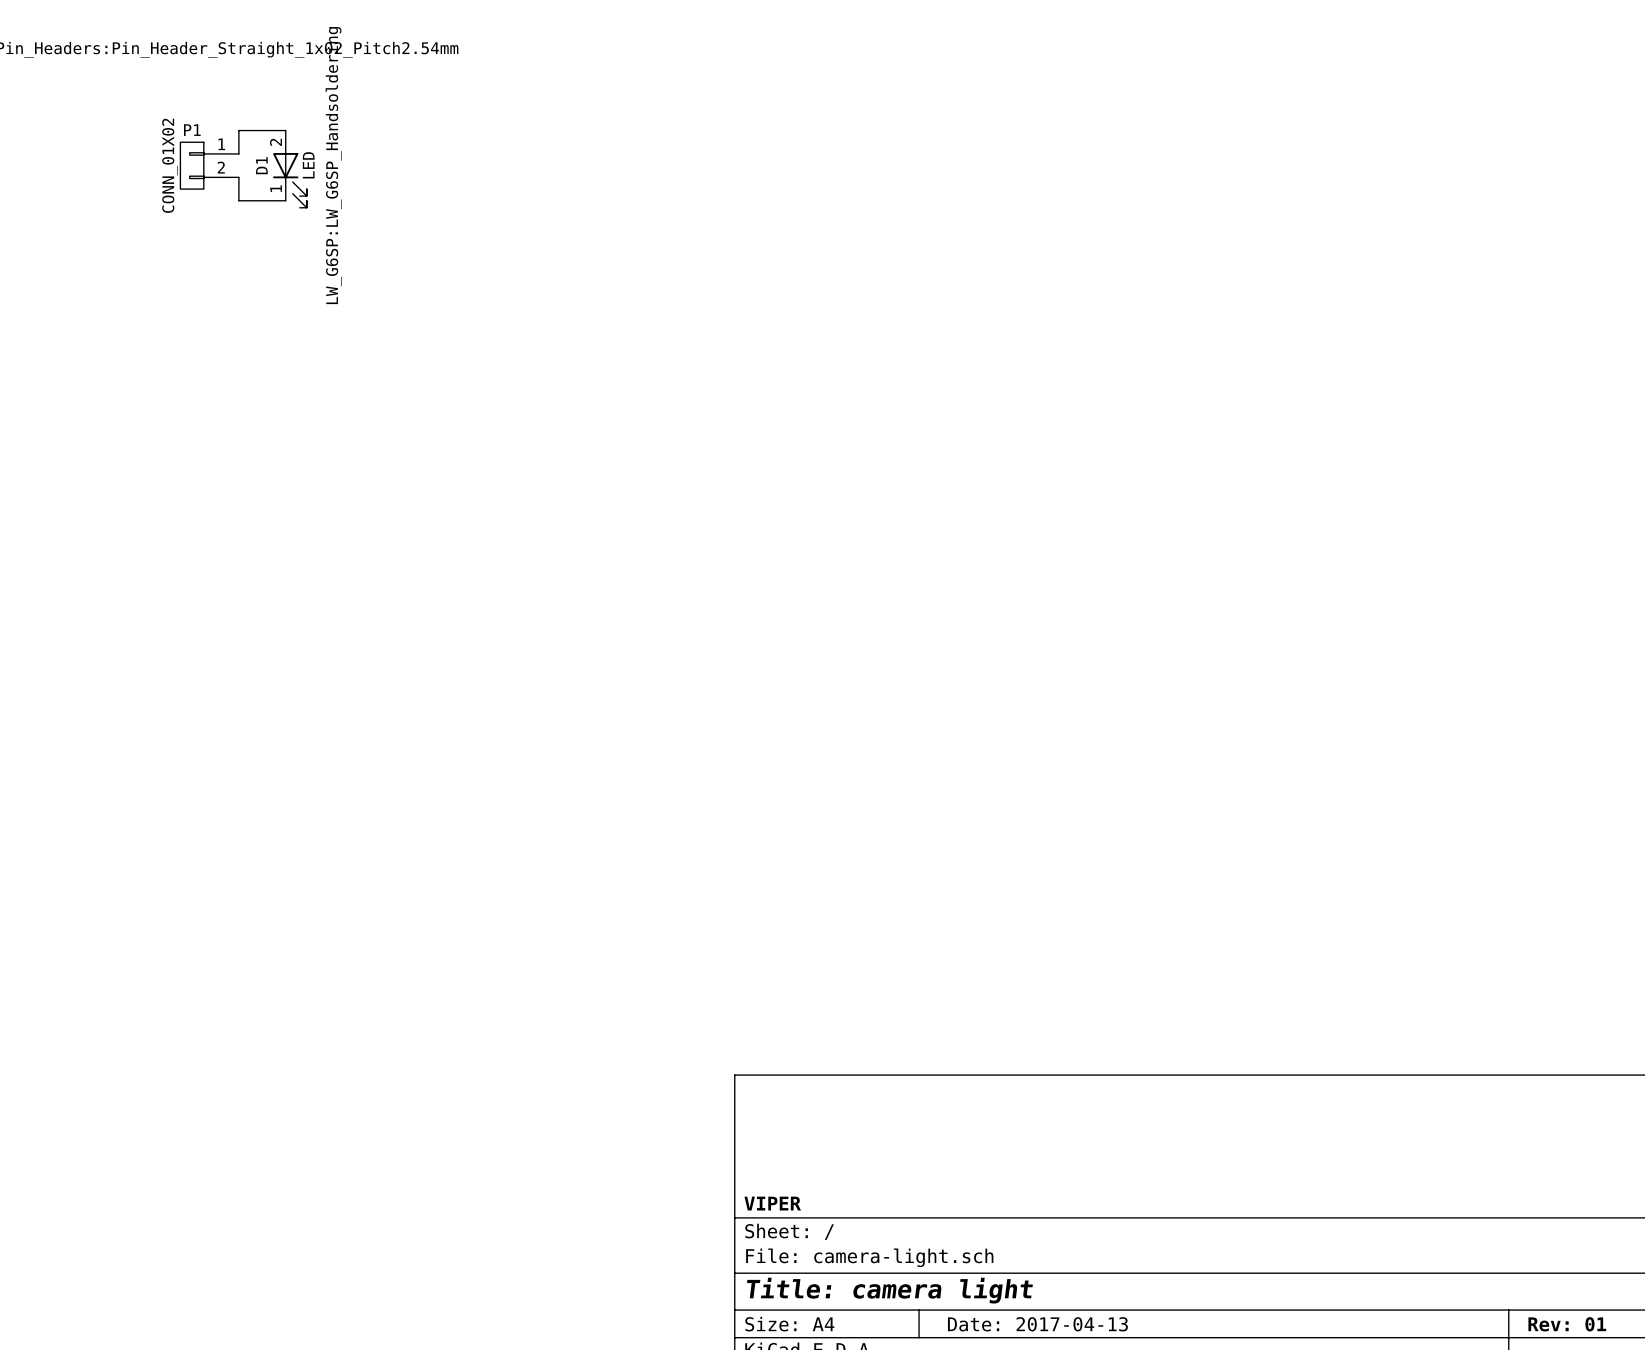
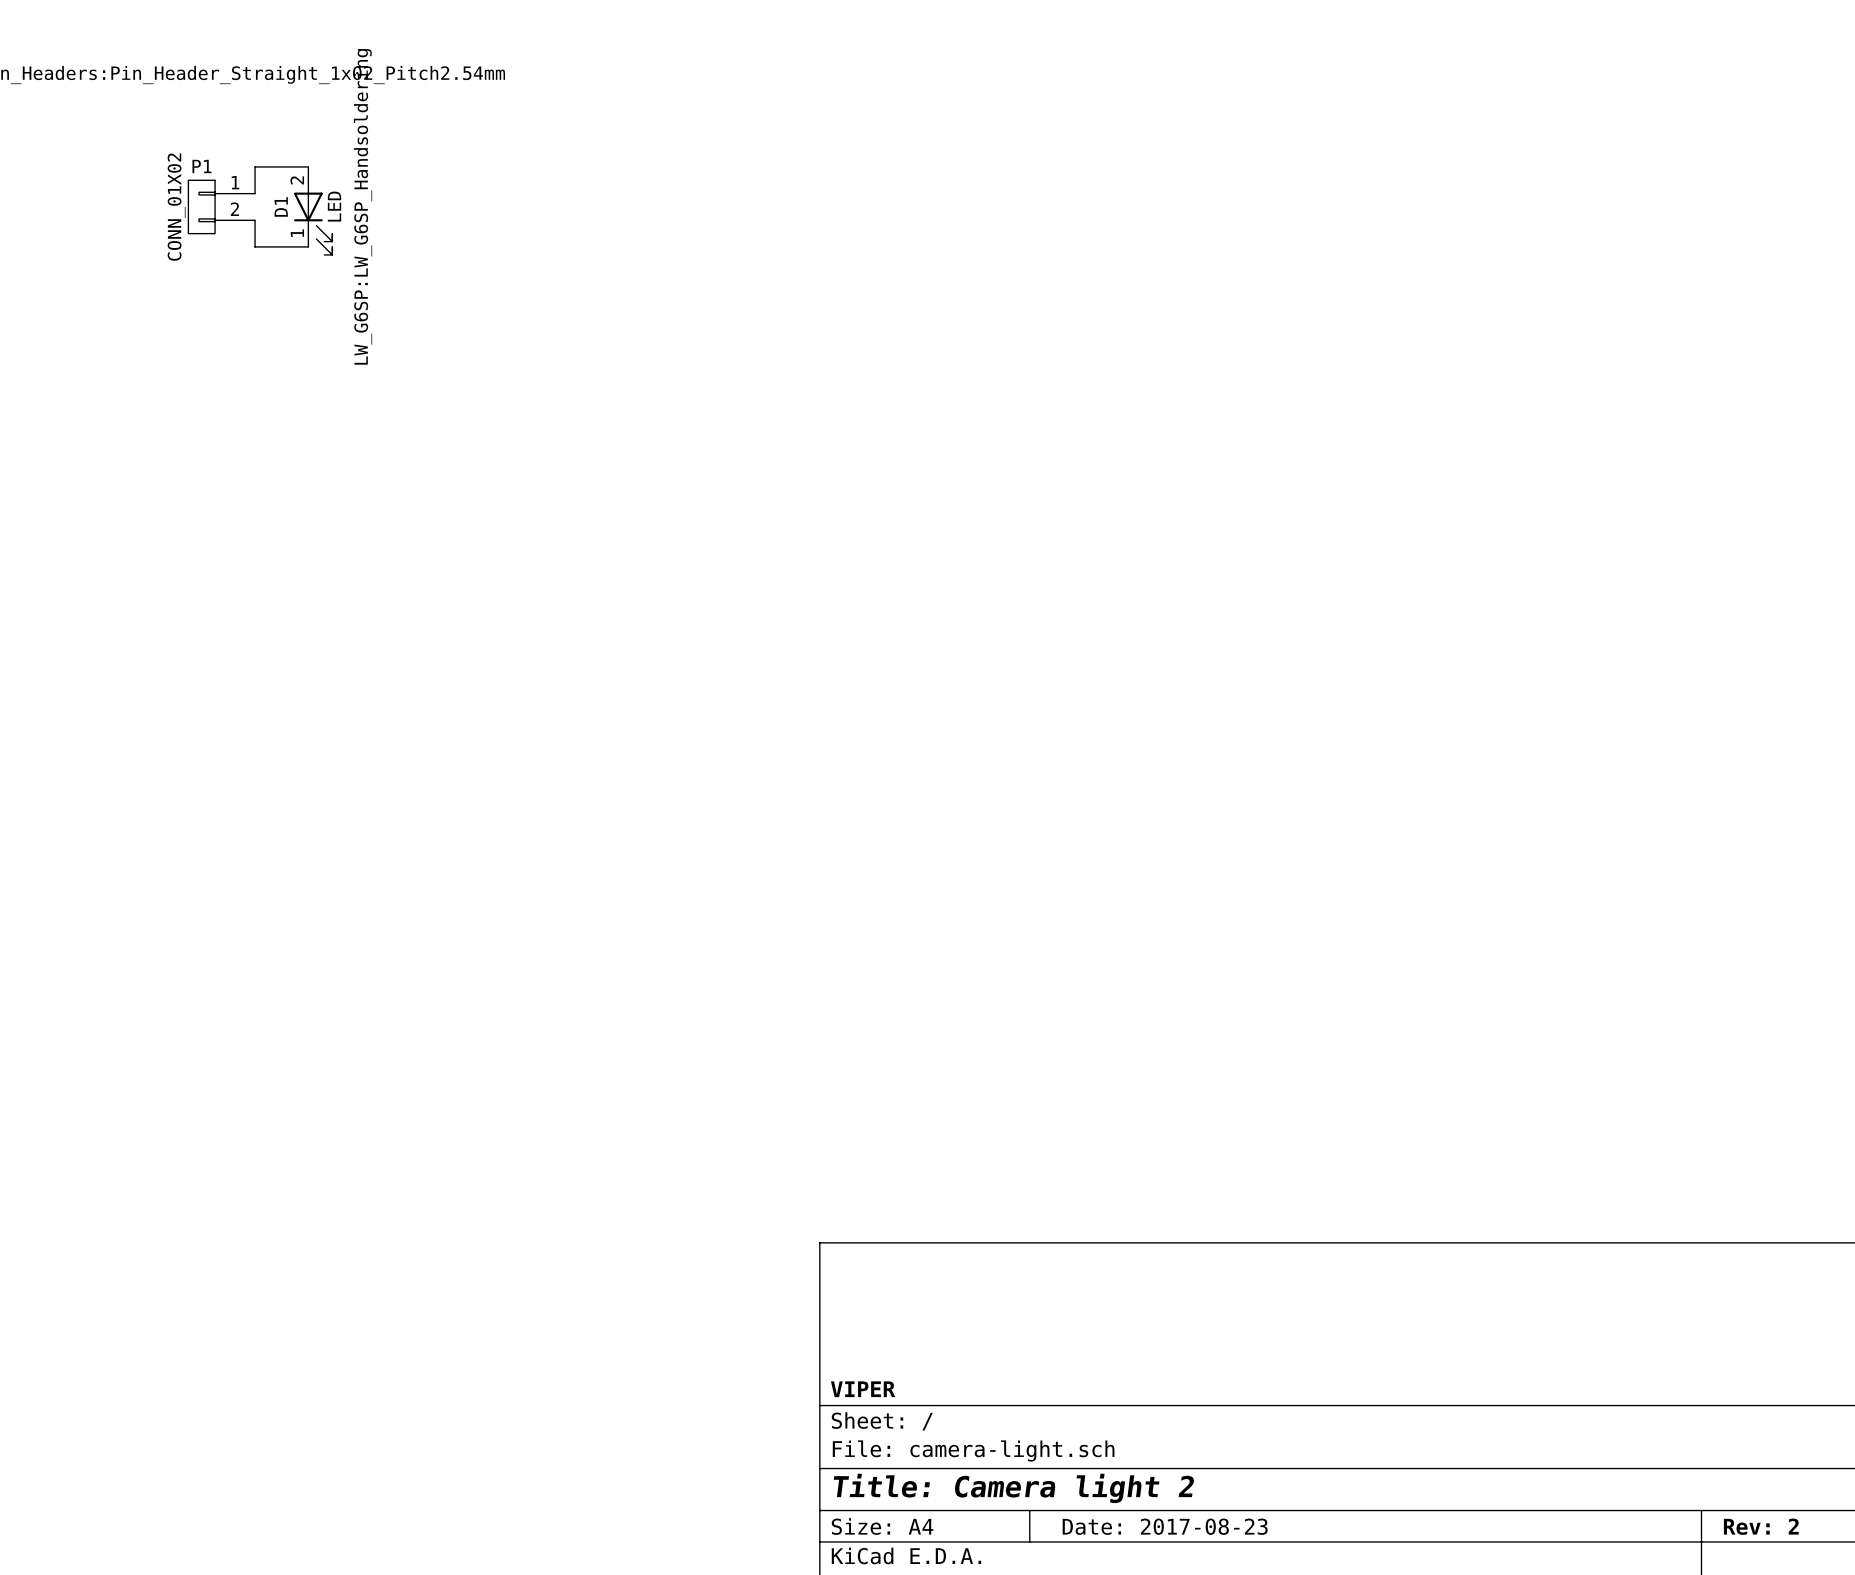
title block: Title: camera light (889, 1290) -> Title: Camera light 2 (1014, 1488)
title block: Date: 2017-04-13 (1037, 1324) -> Date: 2017-08-23 (1165, 1526)
title block: Rev: 01 (1567, 1324) -> Rev: 2 (1761, 1526)

